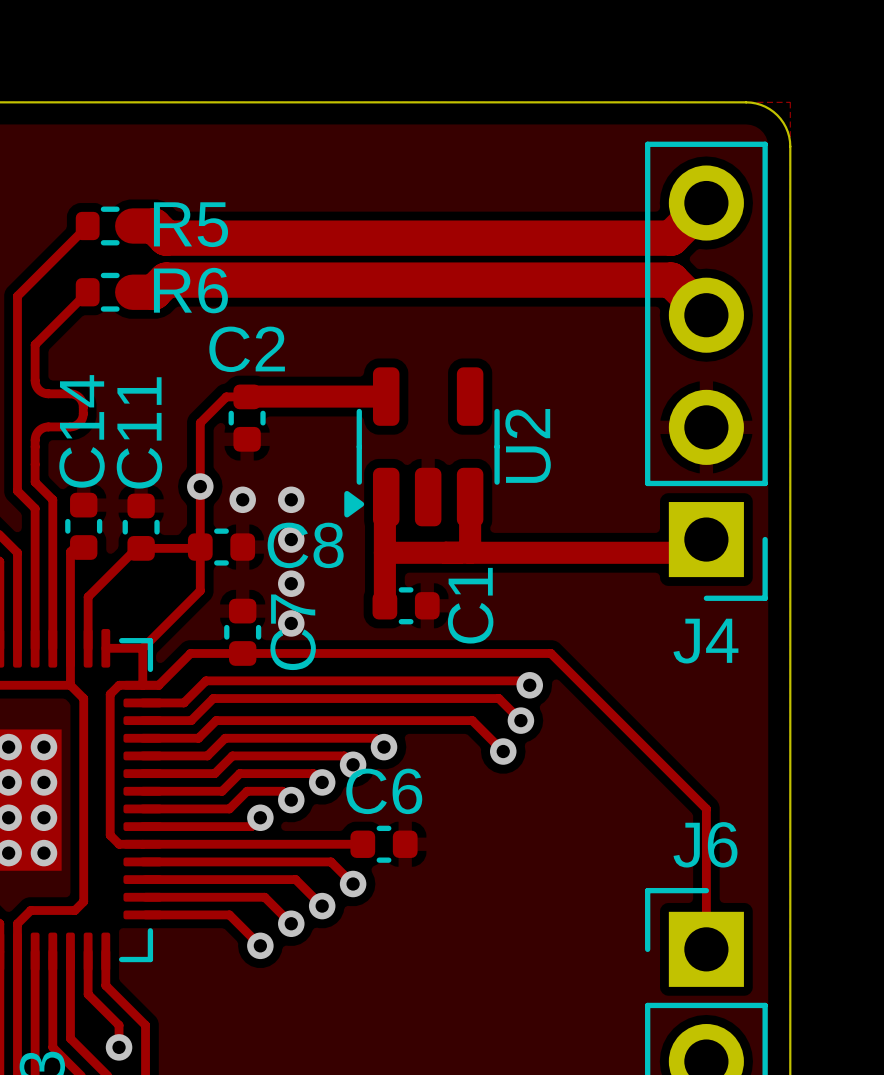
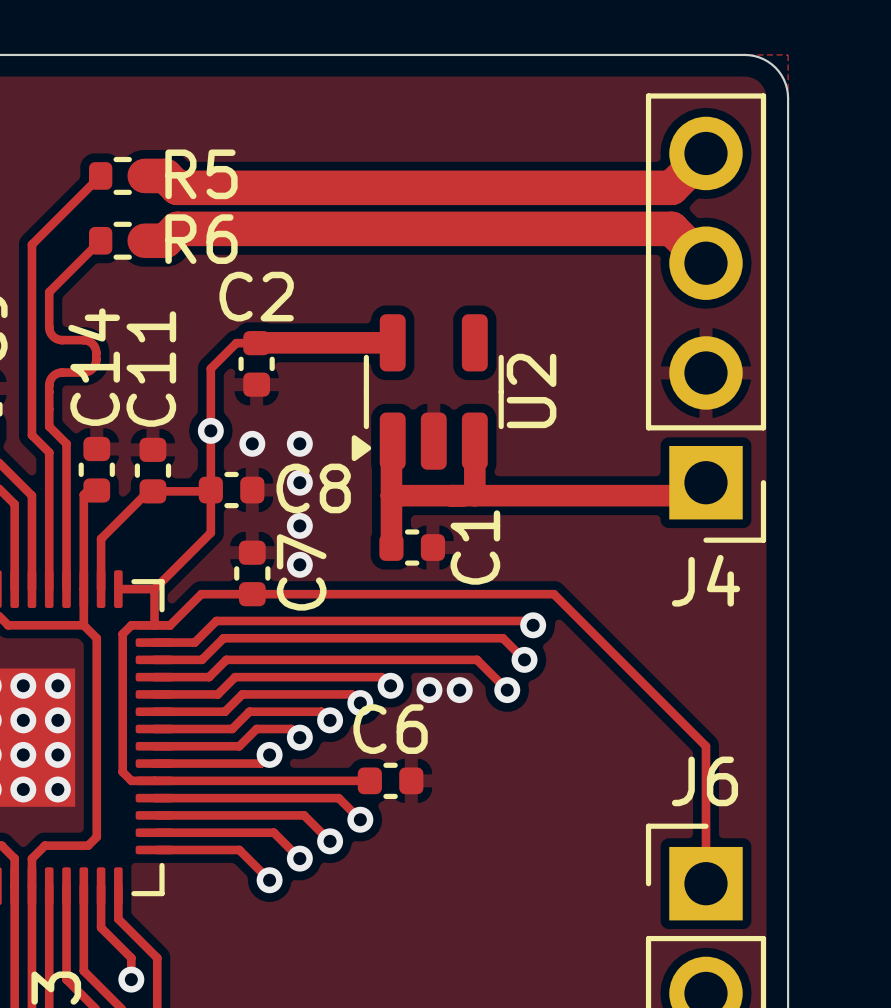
via: none -> (429, 690)
via: none -> (459, 690)

